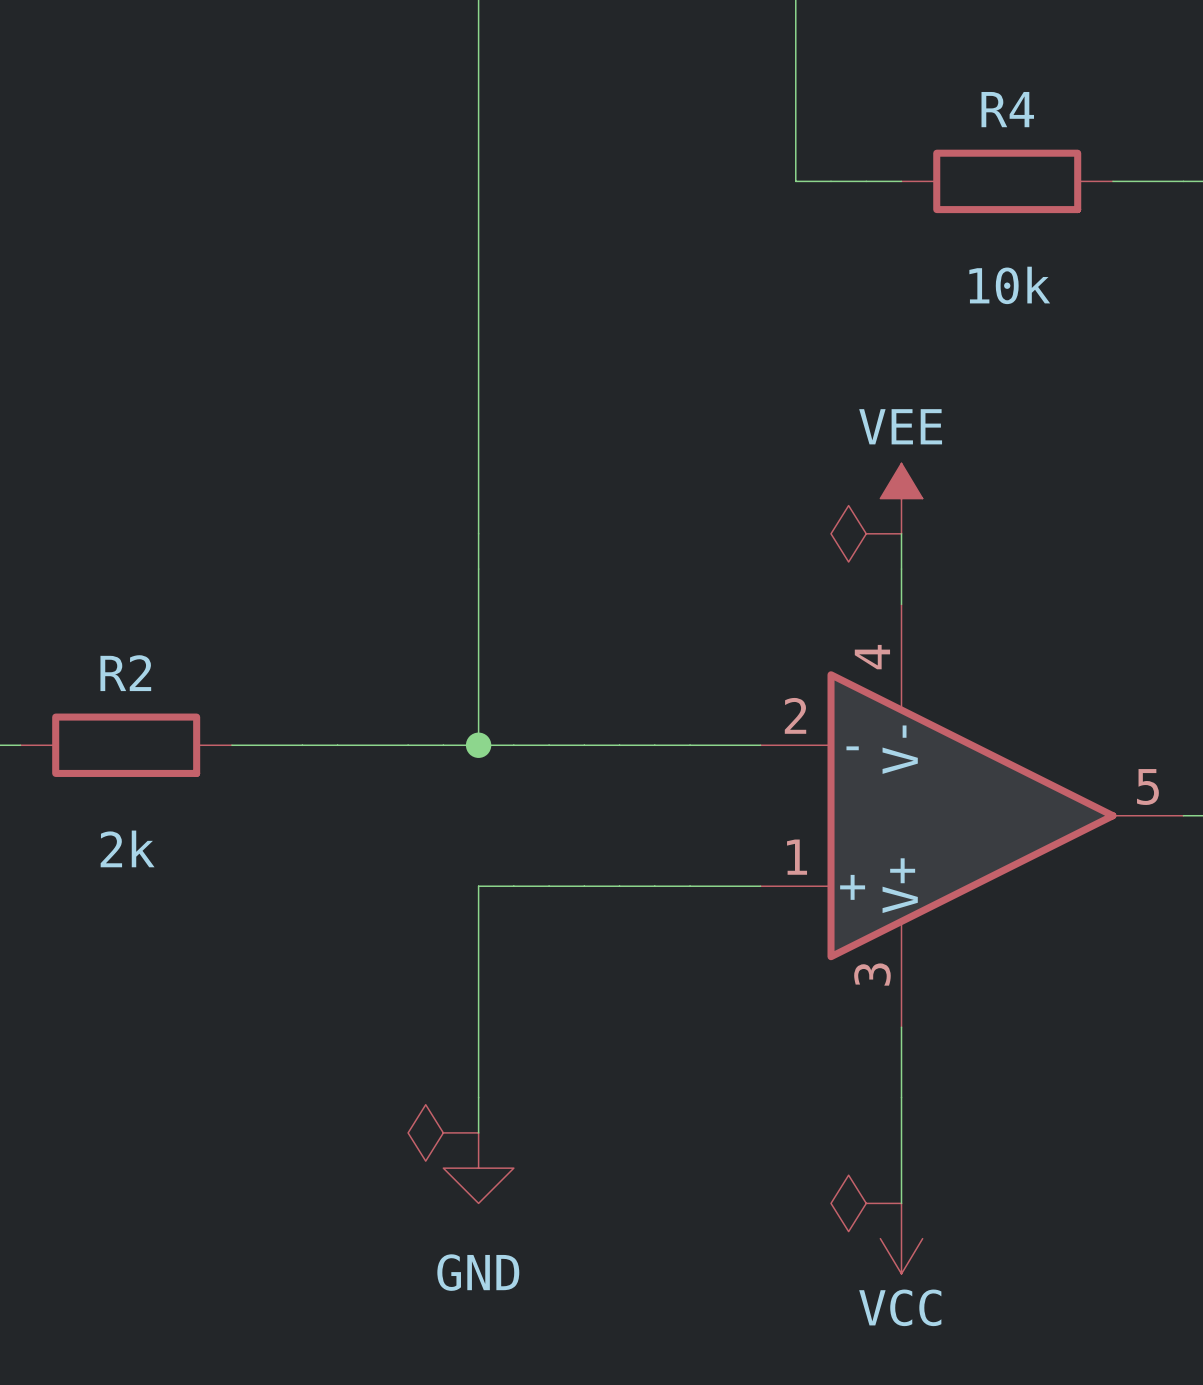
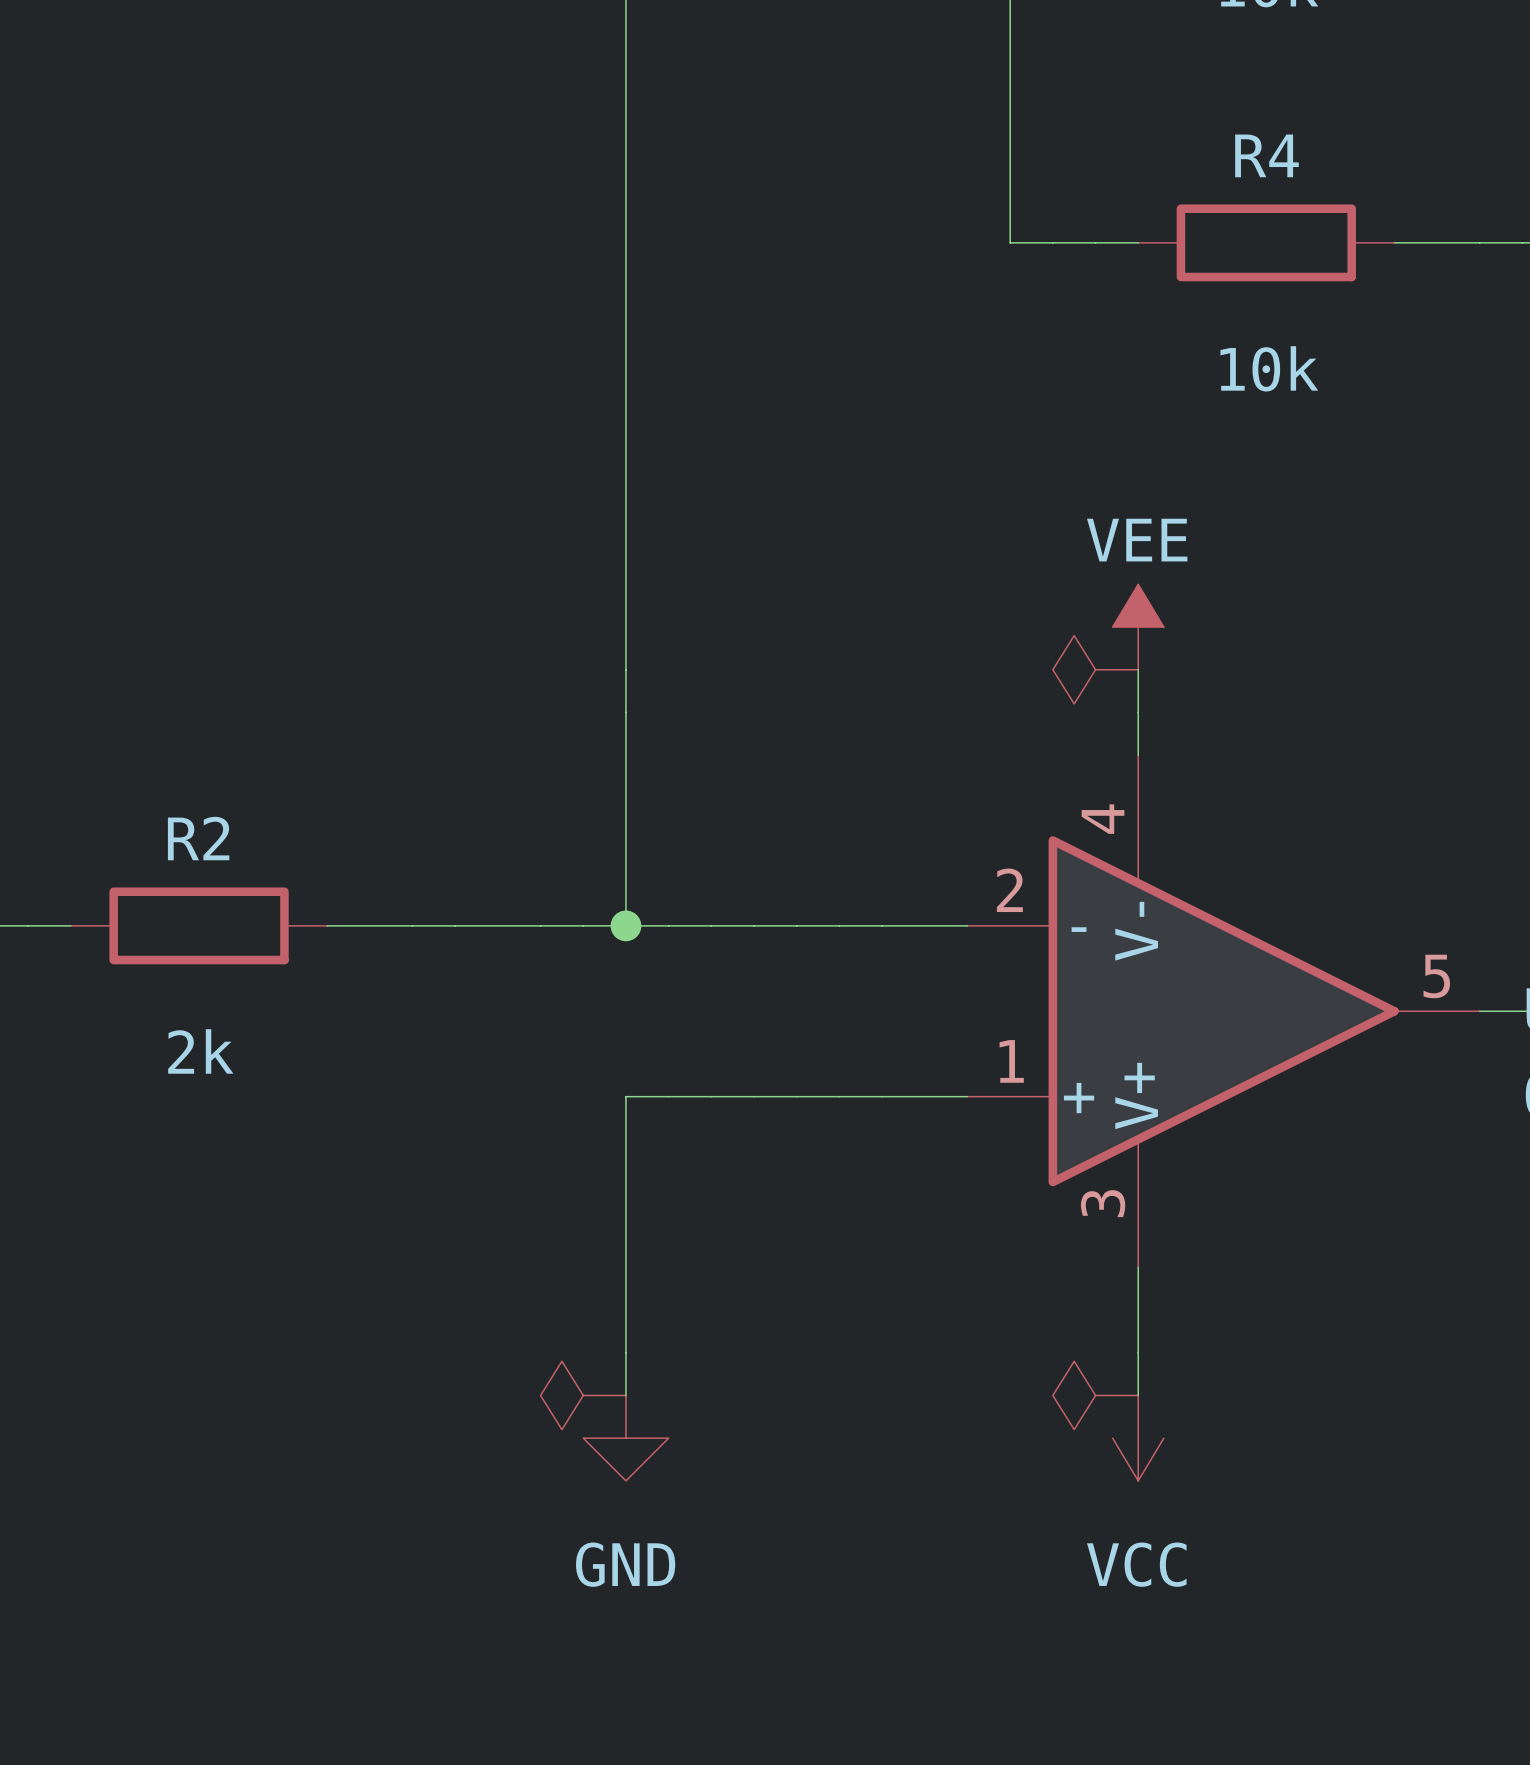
power symbol position: (866, 1203) -> (1095, 1395)
power symbol position: VCC (901, 1238) -> VCC (1138, 1438)
power symbol text position: VCC (900, 1307) -> VCC (1136, 1564)

